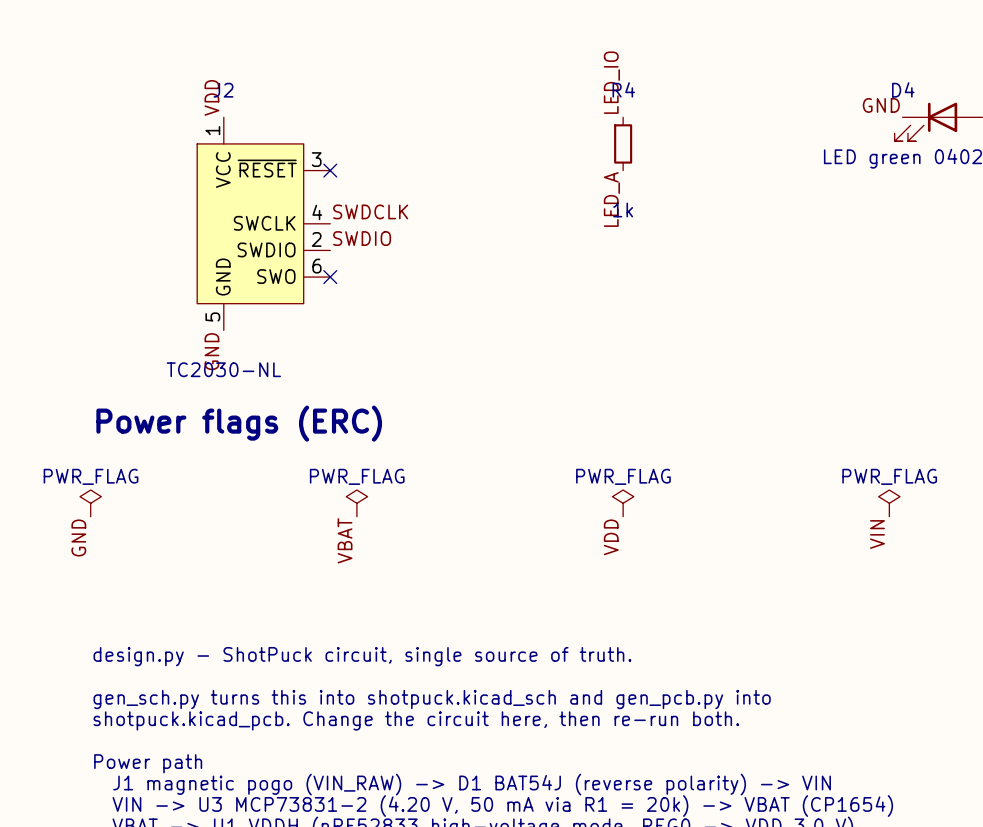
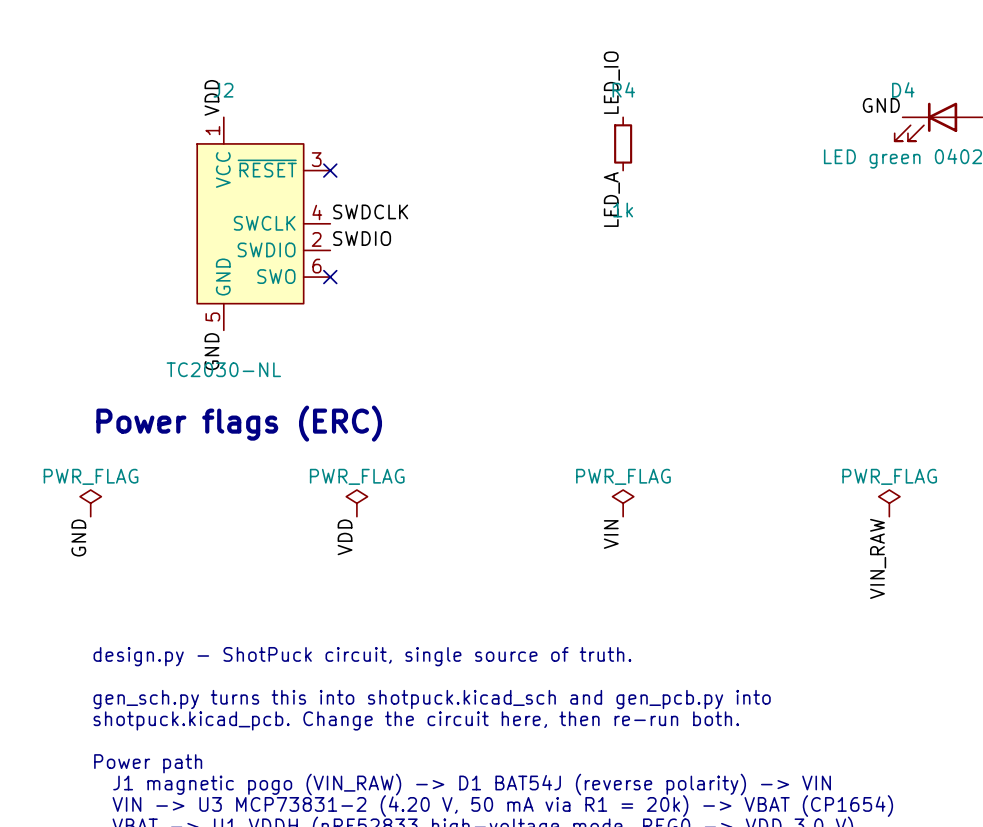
label: VIN (877, 534) -> VIN_RAW (878, 558)
label: VDD (611, 537) -> VIN (611, 534)
label: VBAT (345, 540) -> VDD (345, 537)

